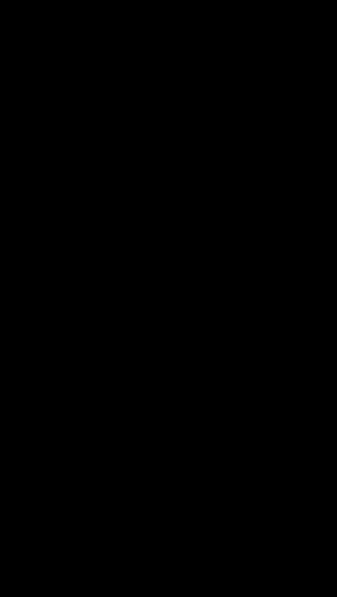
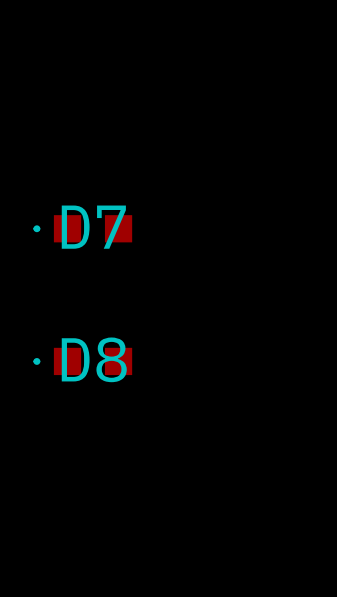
D7: none -> (82, 228)
D8: none -> (82, 361)

